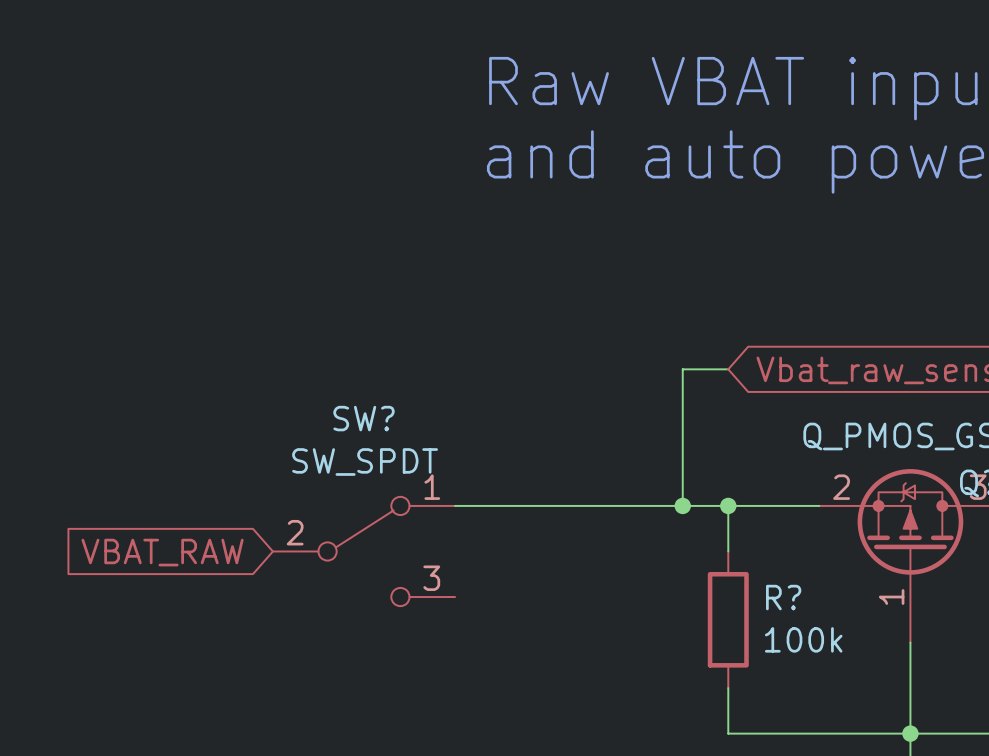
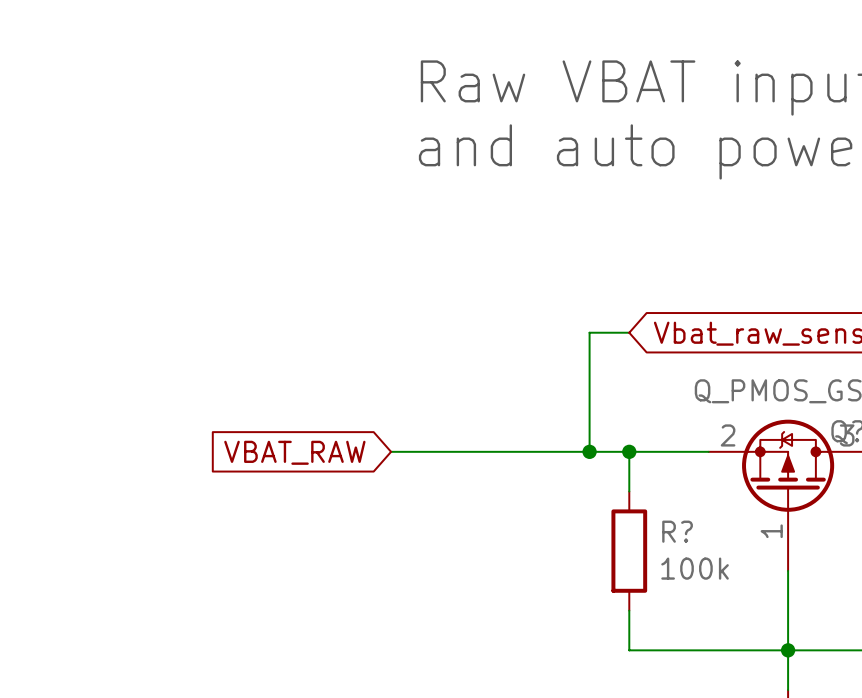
SW?: SW_SPDT (363, 551) -> none
global label position: VBAT_RAW (162, 552) -> VBAT_RAW (294, 452)

